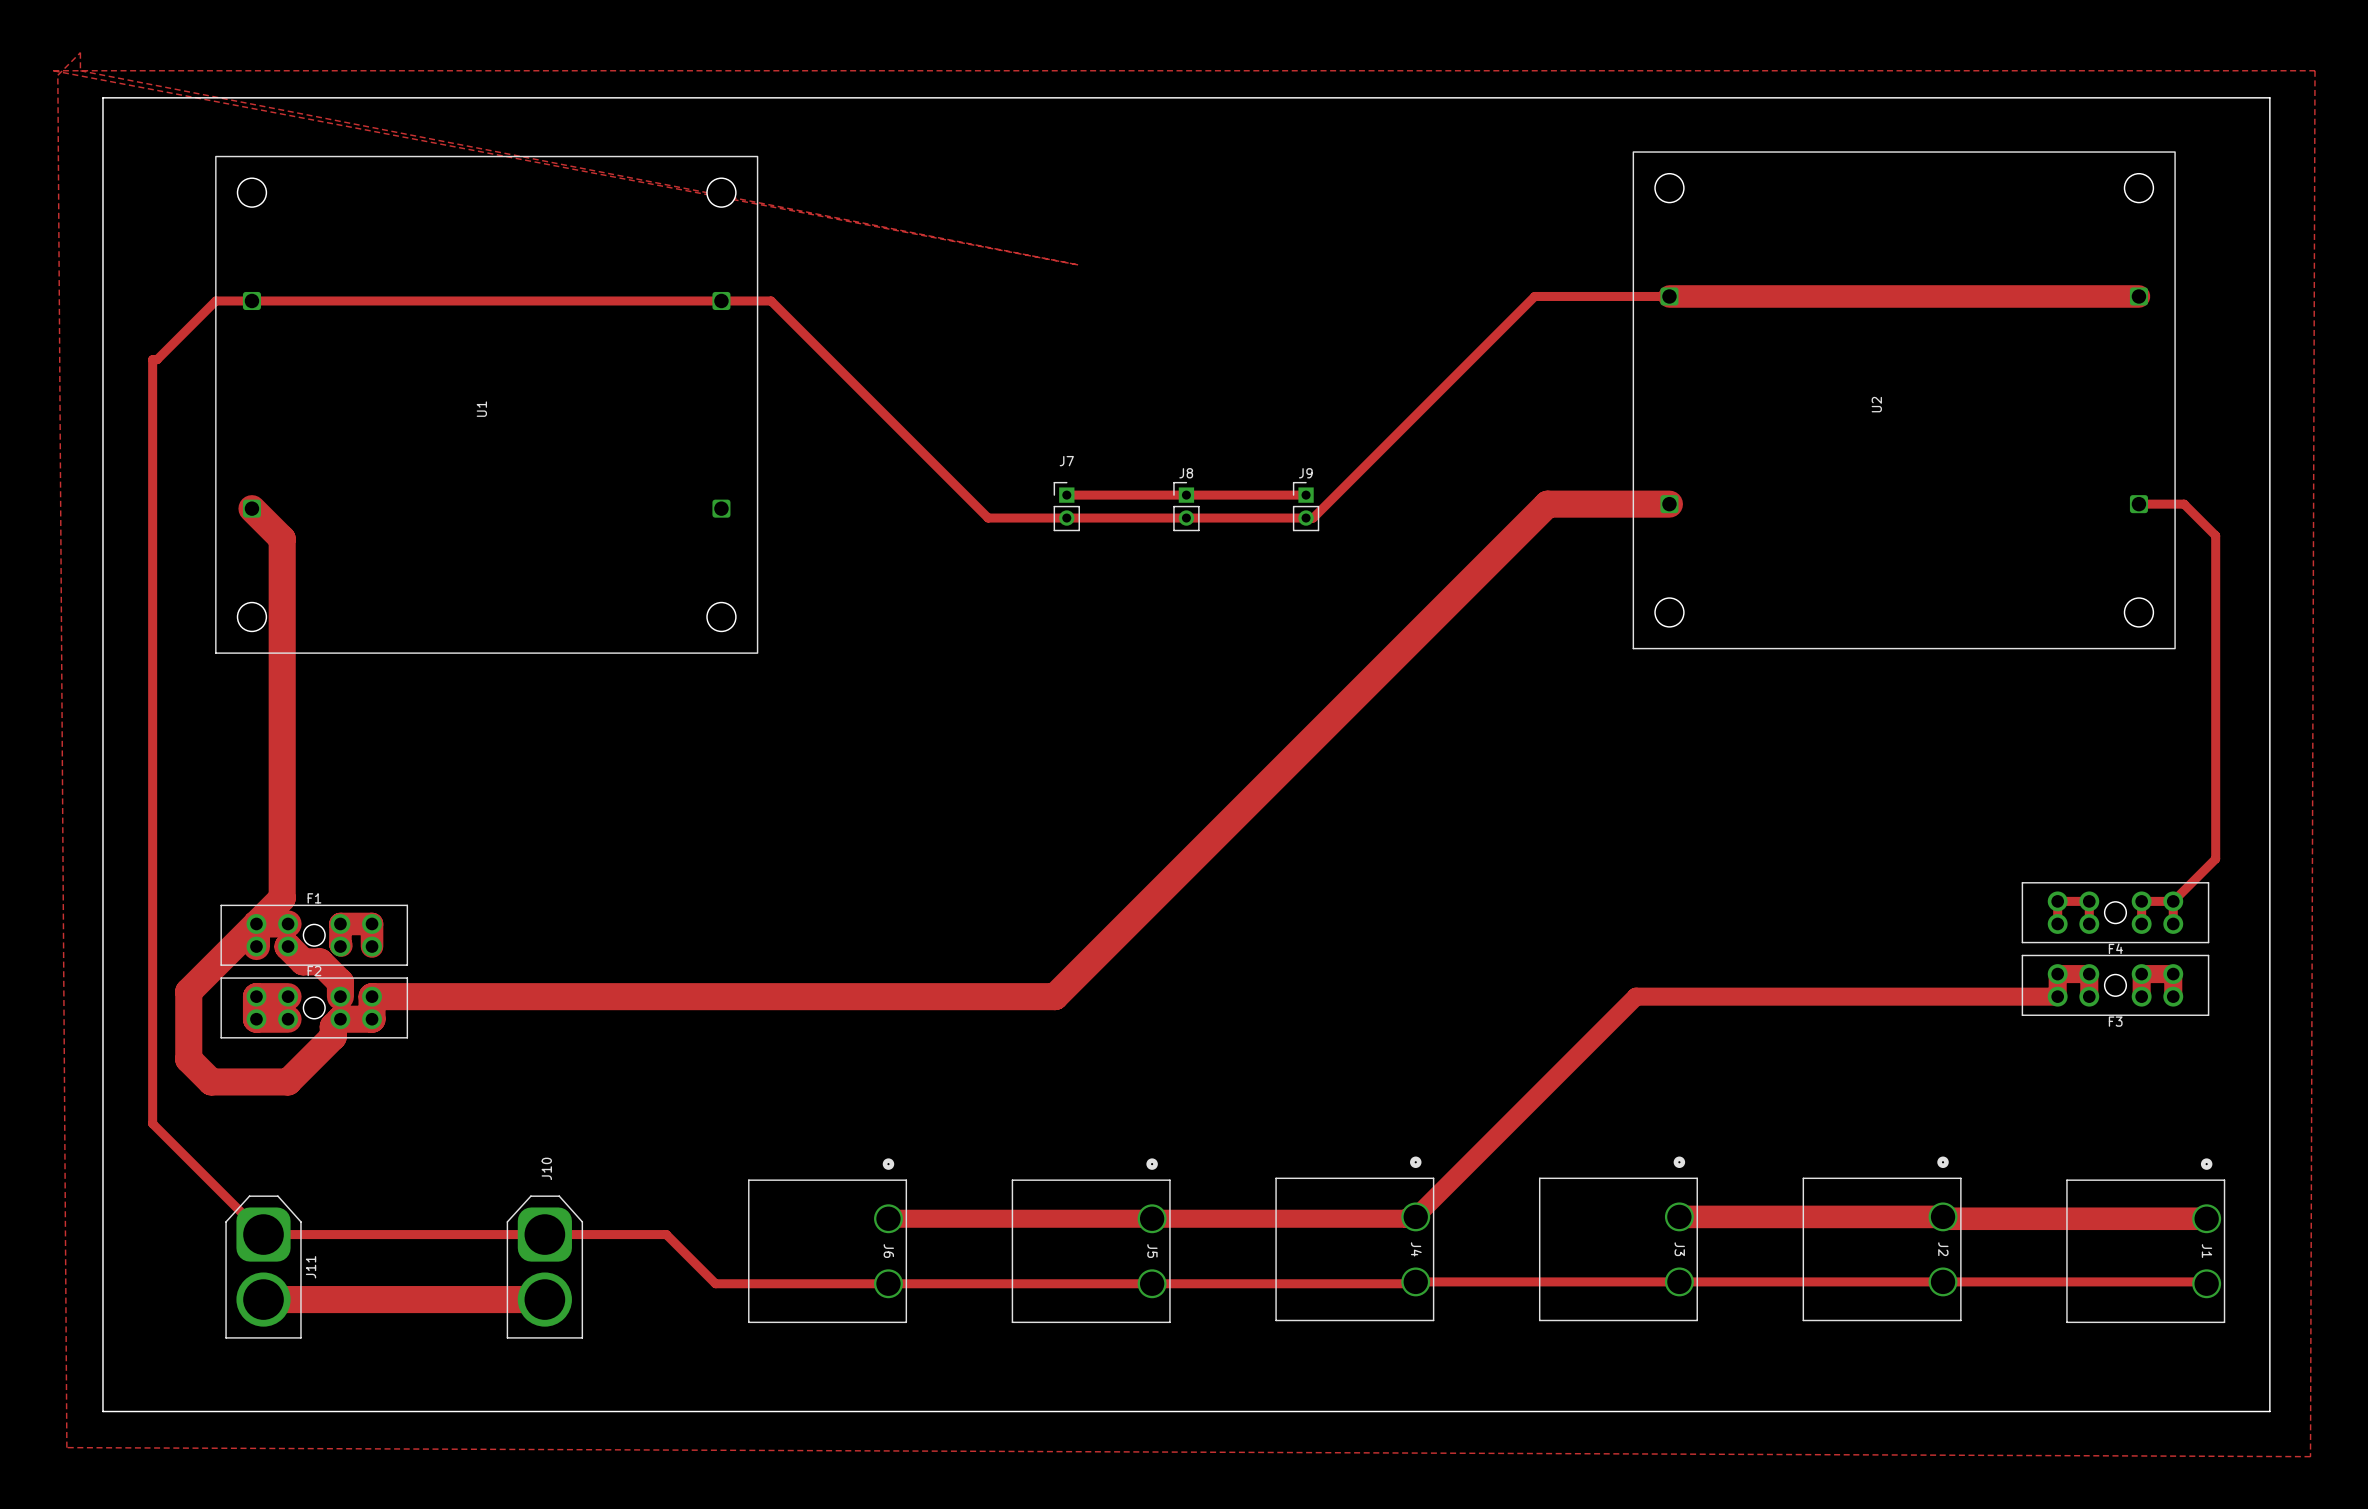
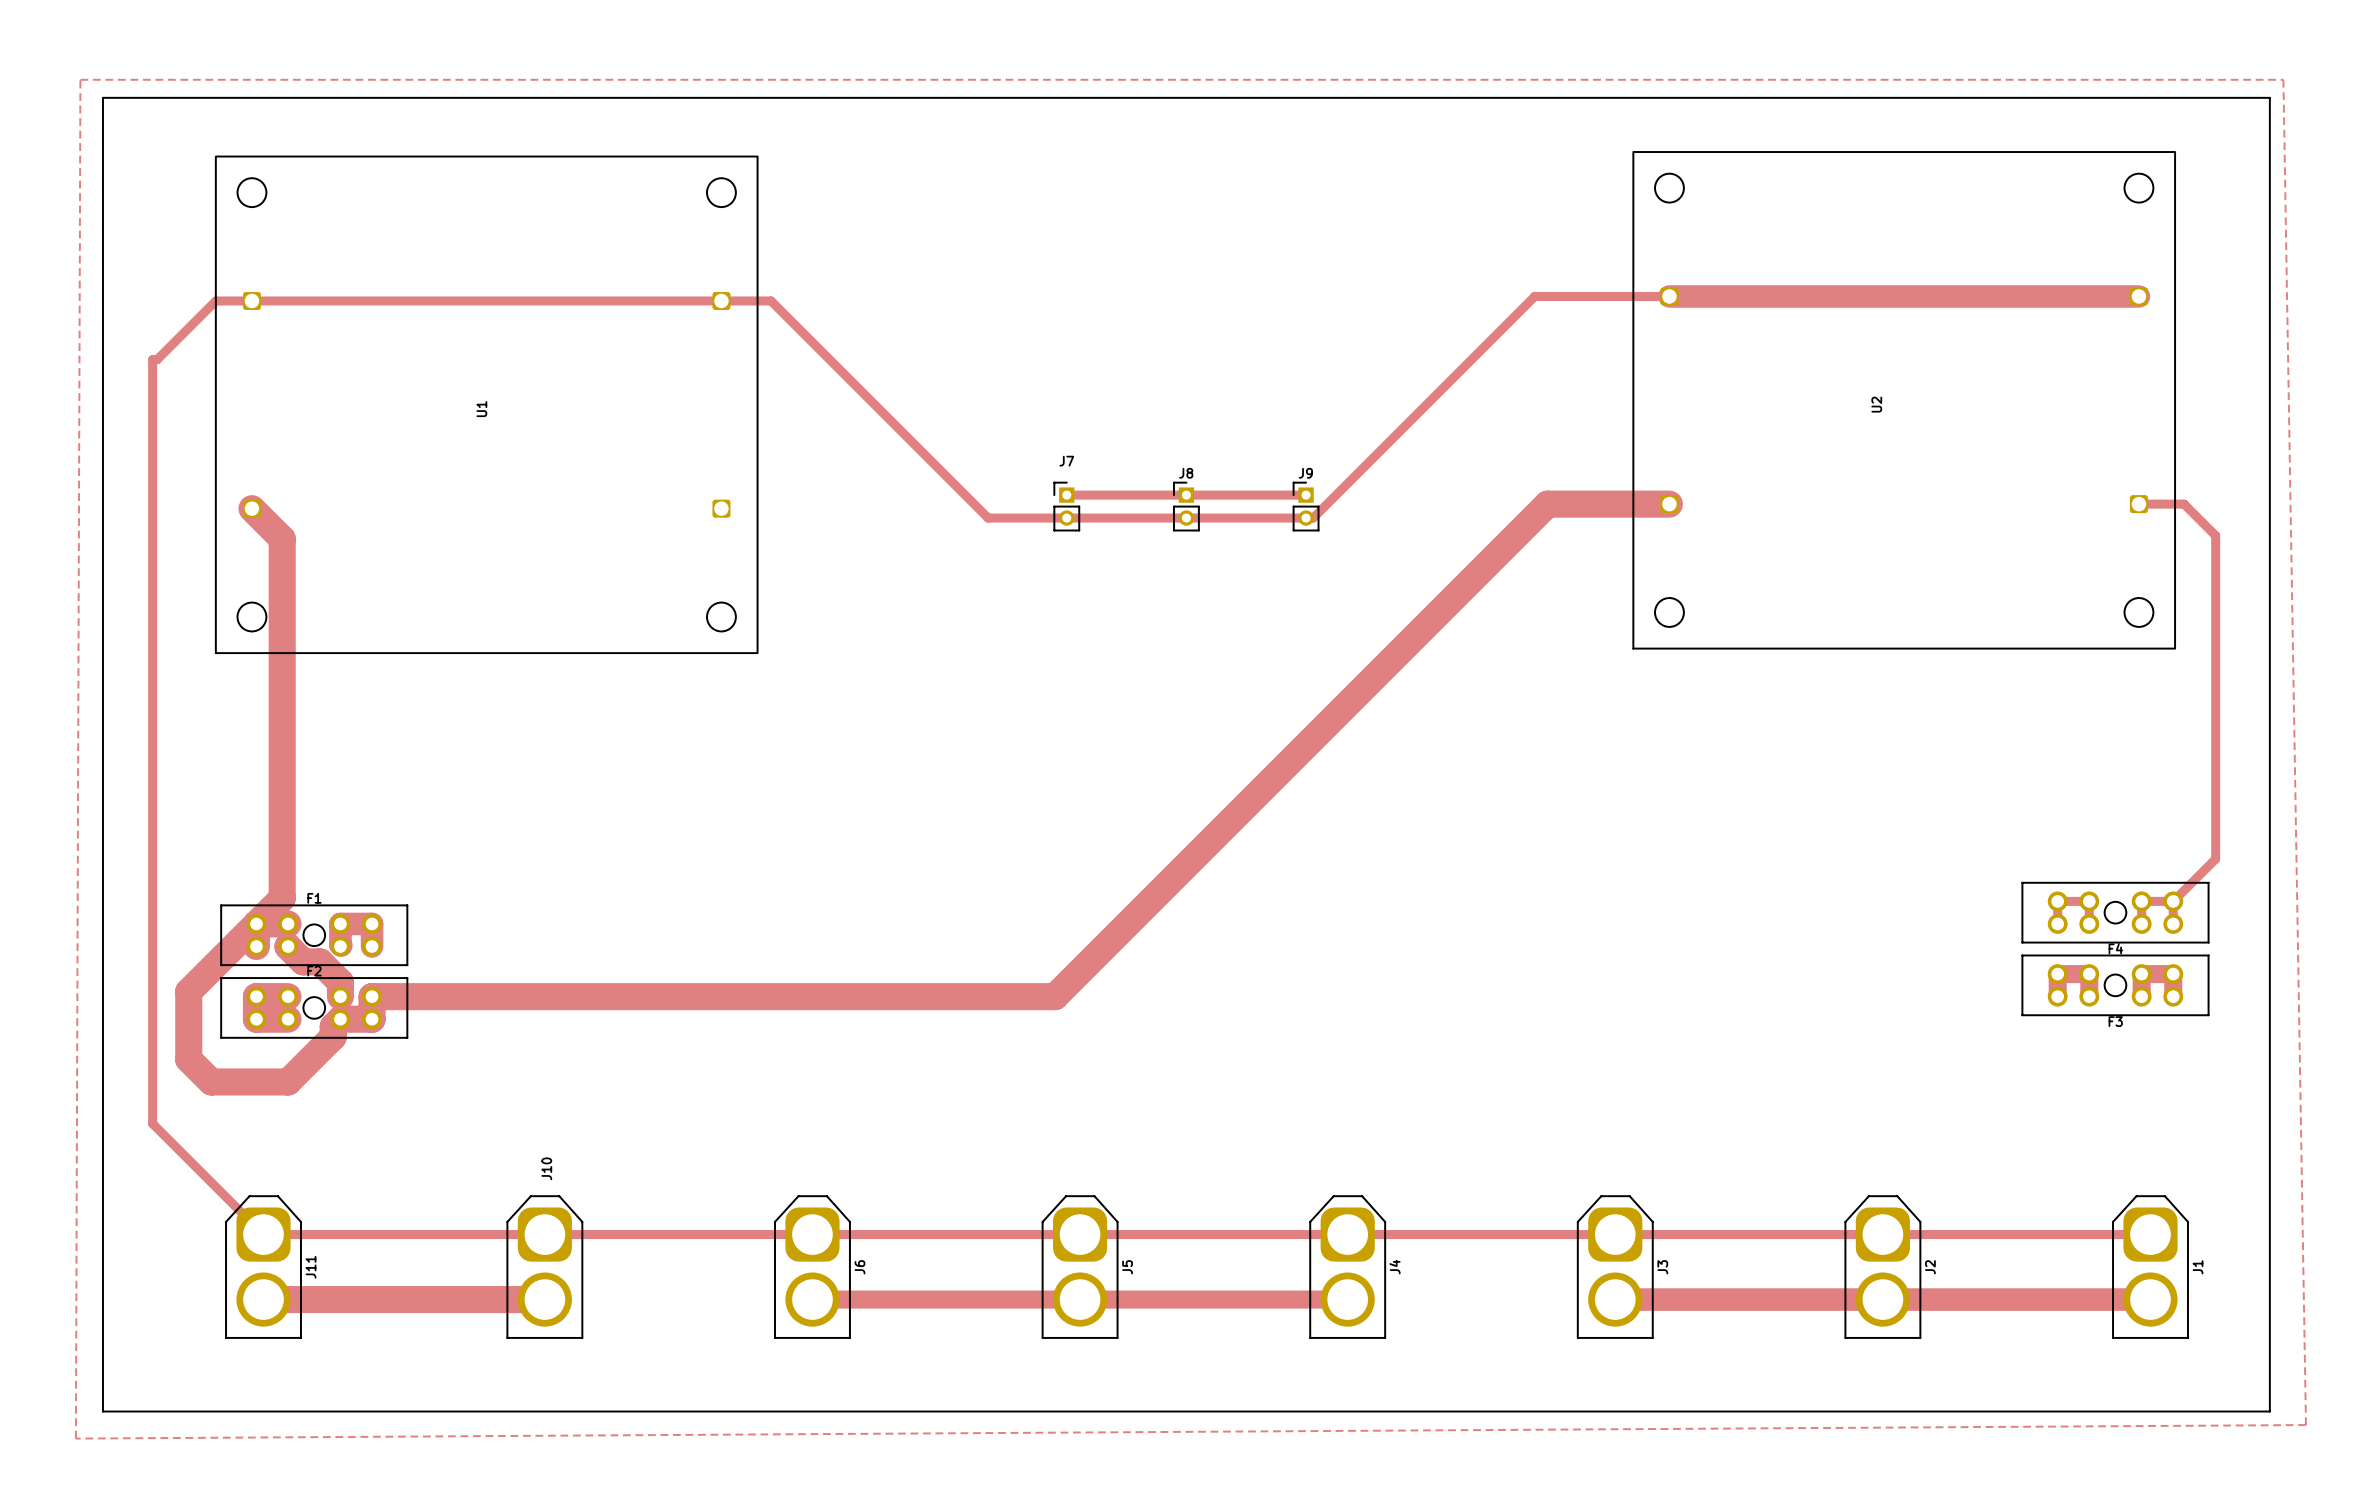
zone outline: (80, 52) (57, 75) (66, 1447) (2310, 1456) (2315, 70) (53, 70) (1078, 264) (80, 70) (80, 52) -> (80, 79) (75, 1438) (2305, 1425) (2283, 79) (80, 79)
track: (2057, 996) (1636, 996) (1415, 1216) (1406, 1218) (888, 1218) -> none
J4 footprint: [1275, 1156, 1435, 1322] -> [1309, 1195, 1386, 1339]
J3 footprint: [1539, 1156, 1698, 1322] -> [1577, 1195, 1654, 1339]
J2 footprint: [1802, 1156, 1962, 1322] -> [1844, 1195, 1921, 1339]
J6 footprint: [748, 1158, 908, 1324] -> [774, 1195, 851, 1339]
J5 footprint: [1011, 1158, 1171, 1324] -> [1042, 1195, 1119, 1339]
J1 footprint: [2066, 1158, 2226, 1324] -> [2112, 1195, 2189, 1339]
track: (1679, 1216) (2206, 1218) -> none
track: (666, 1234) (715, 1283) (1413, 1283) (1415, 1281) (2204, 1281) (2206, 1283) -> (666, 1234) (2150, 1234)
track: none -> (812, 1299) (1347, 1299)
track: none -> (1615, 1299) (2150, 1299)

